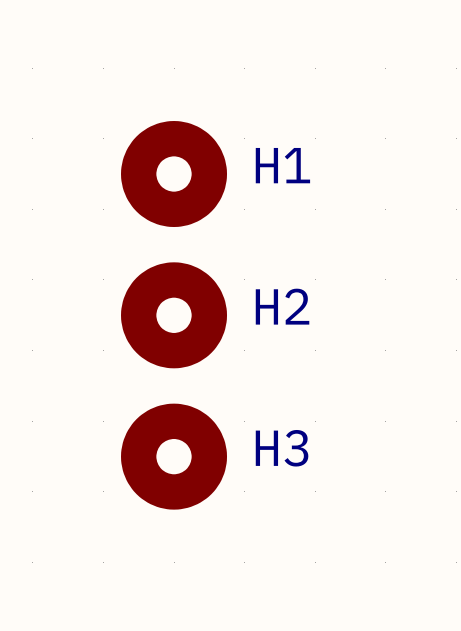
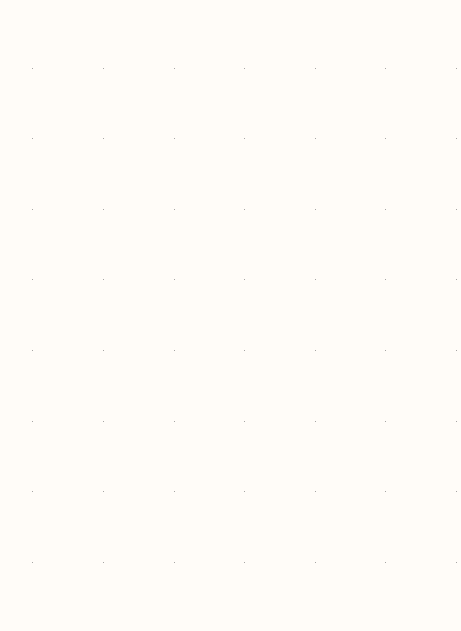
H1: (174, 174) -> none
H2: (174, 315) -> none
H3: (174, 456) -> none

